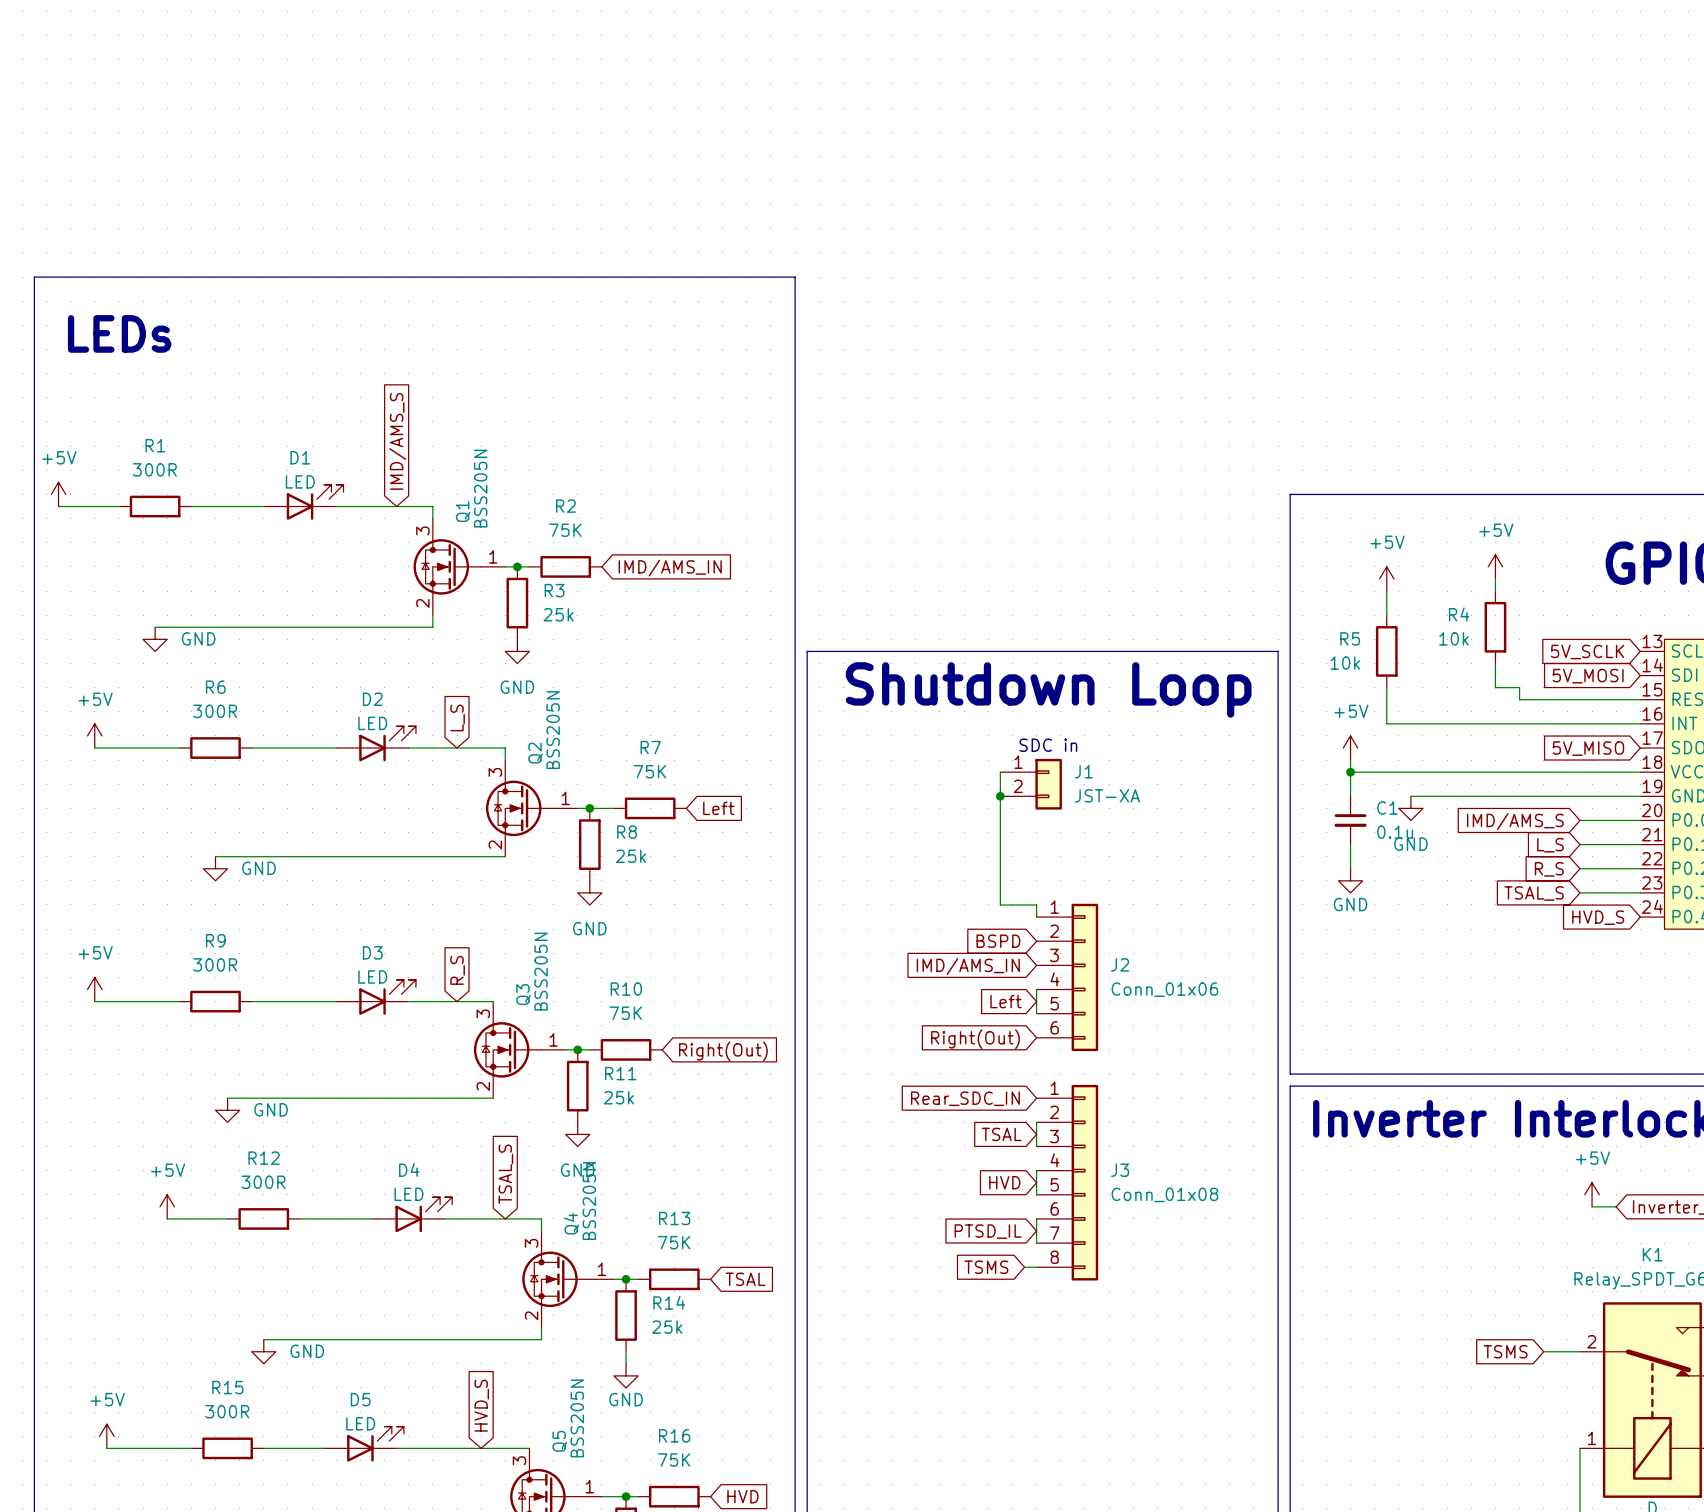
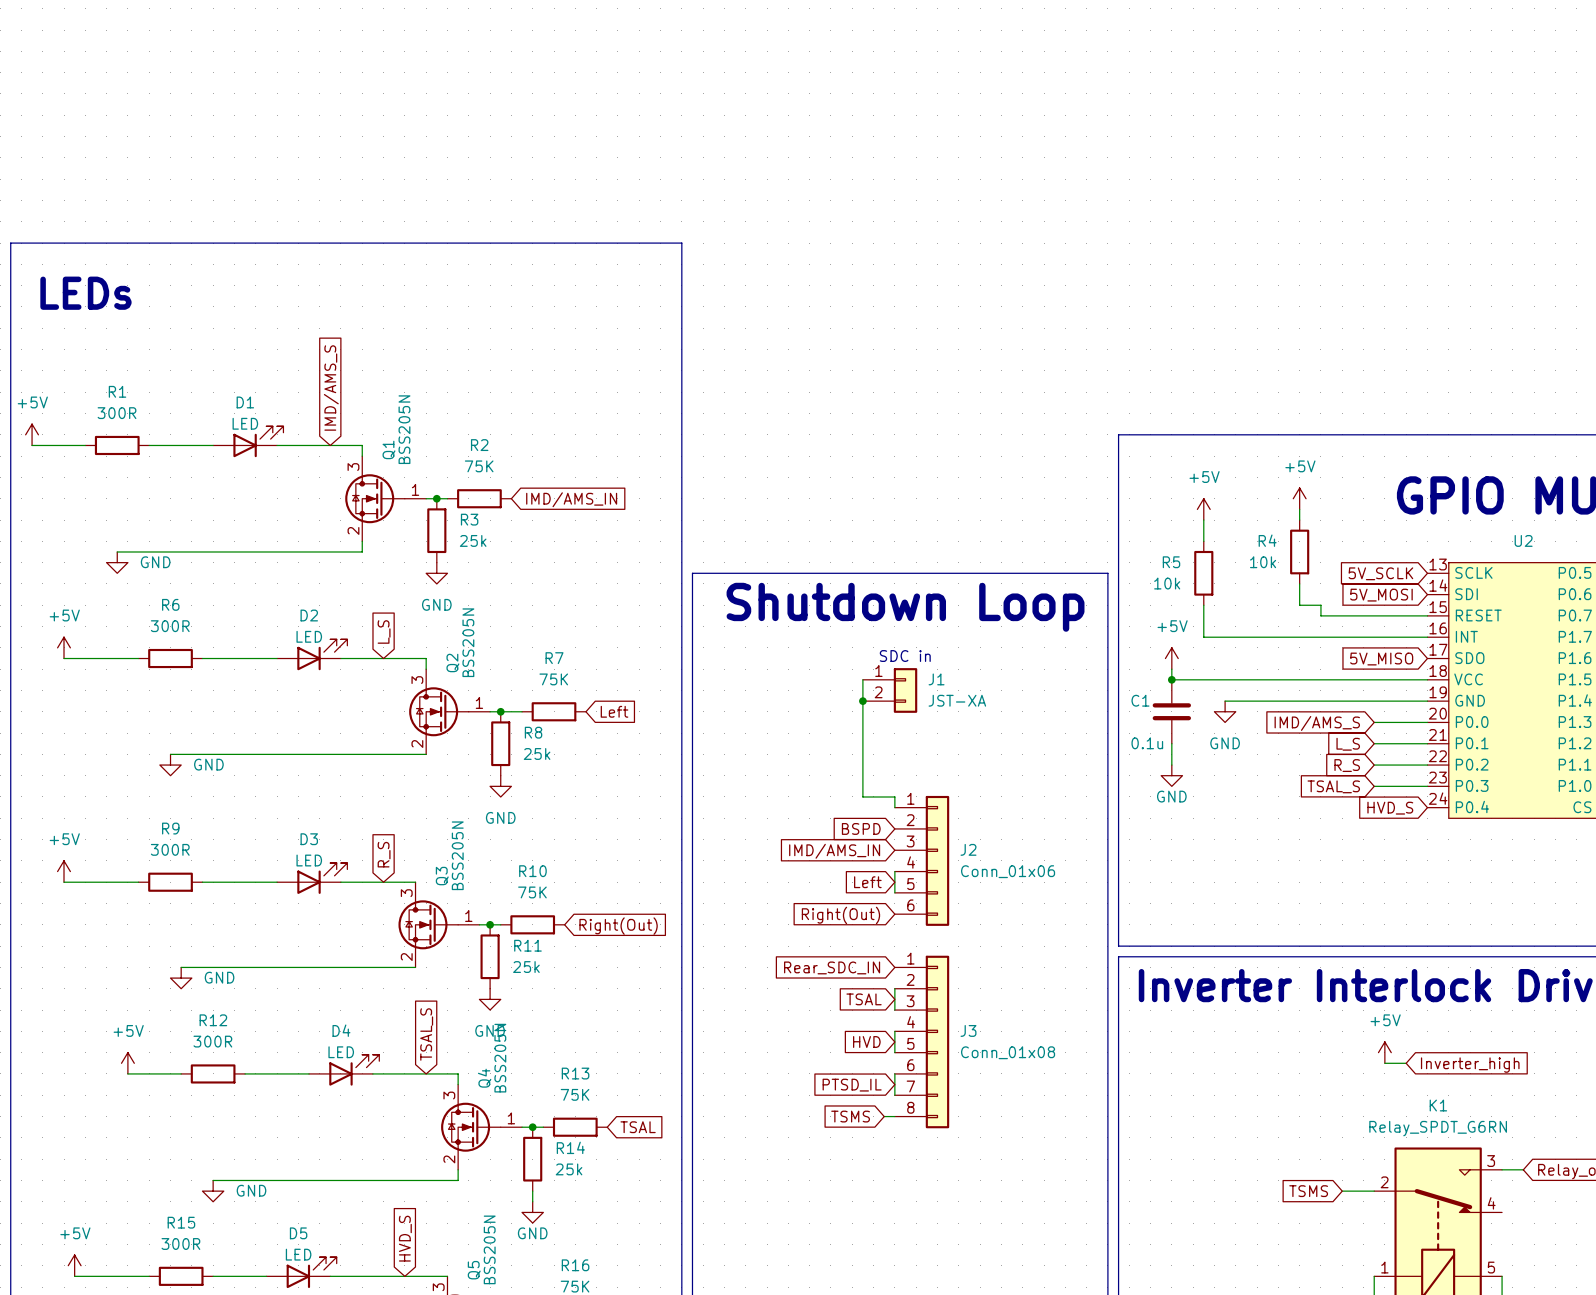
C1 symbol: [1334, 796, 1367, 845] -> [1152, 679, 1192, 744]
C1 name position: C1 (1387, 808) -> C1 (1140, 700)
C1 value position: 0.1u (1395, 832) -> 0.1u (1147, 743)

